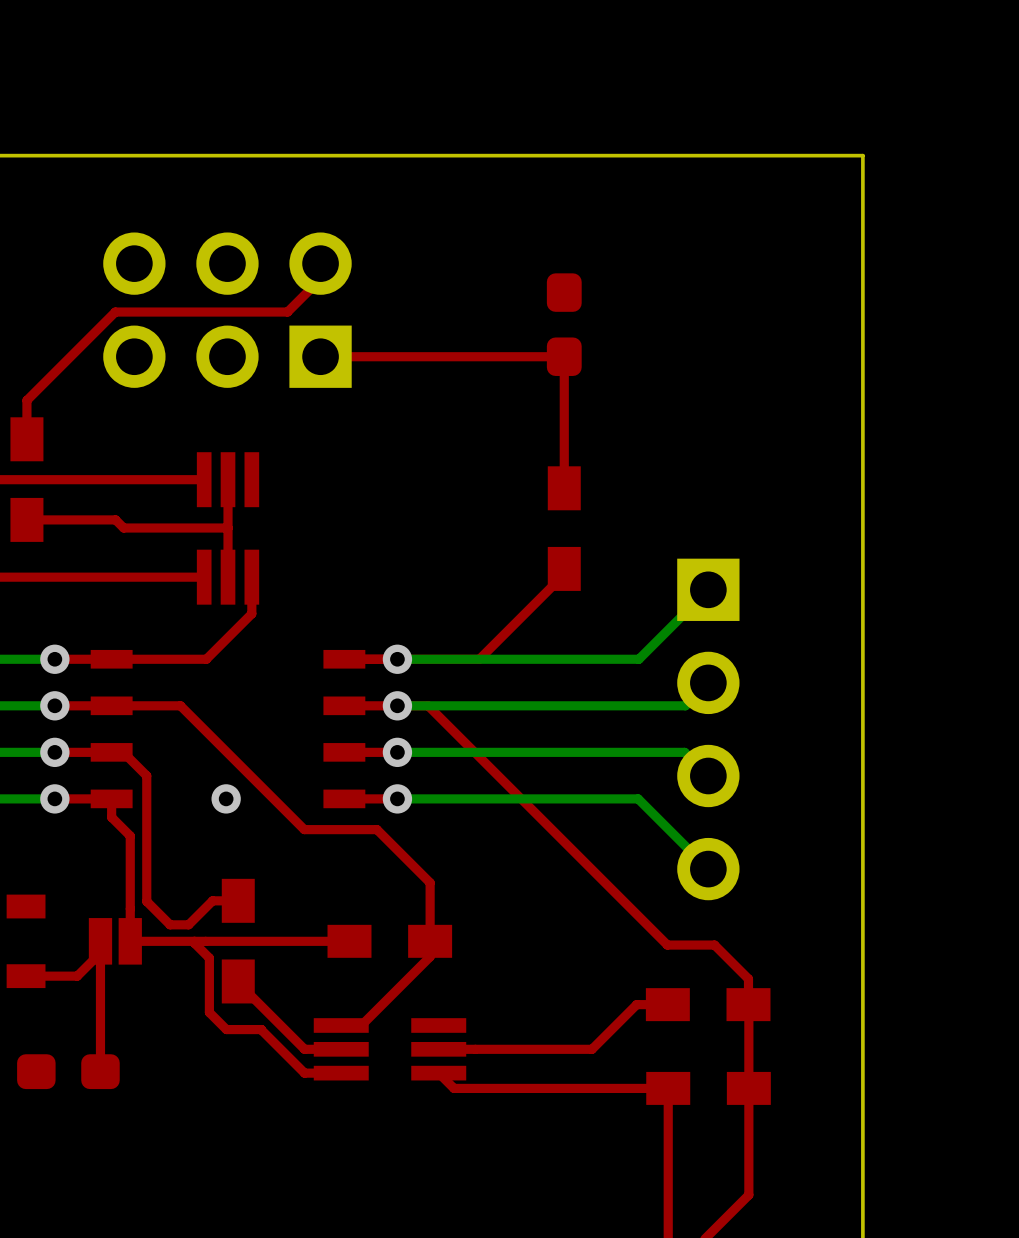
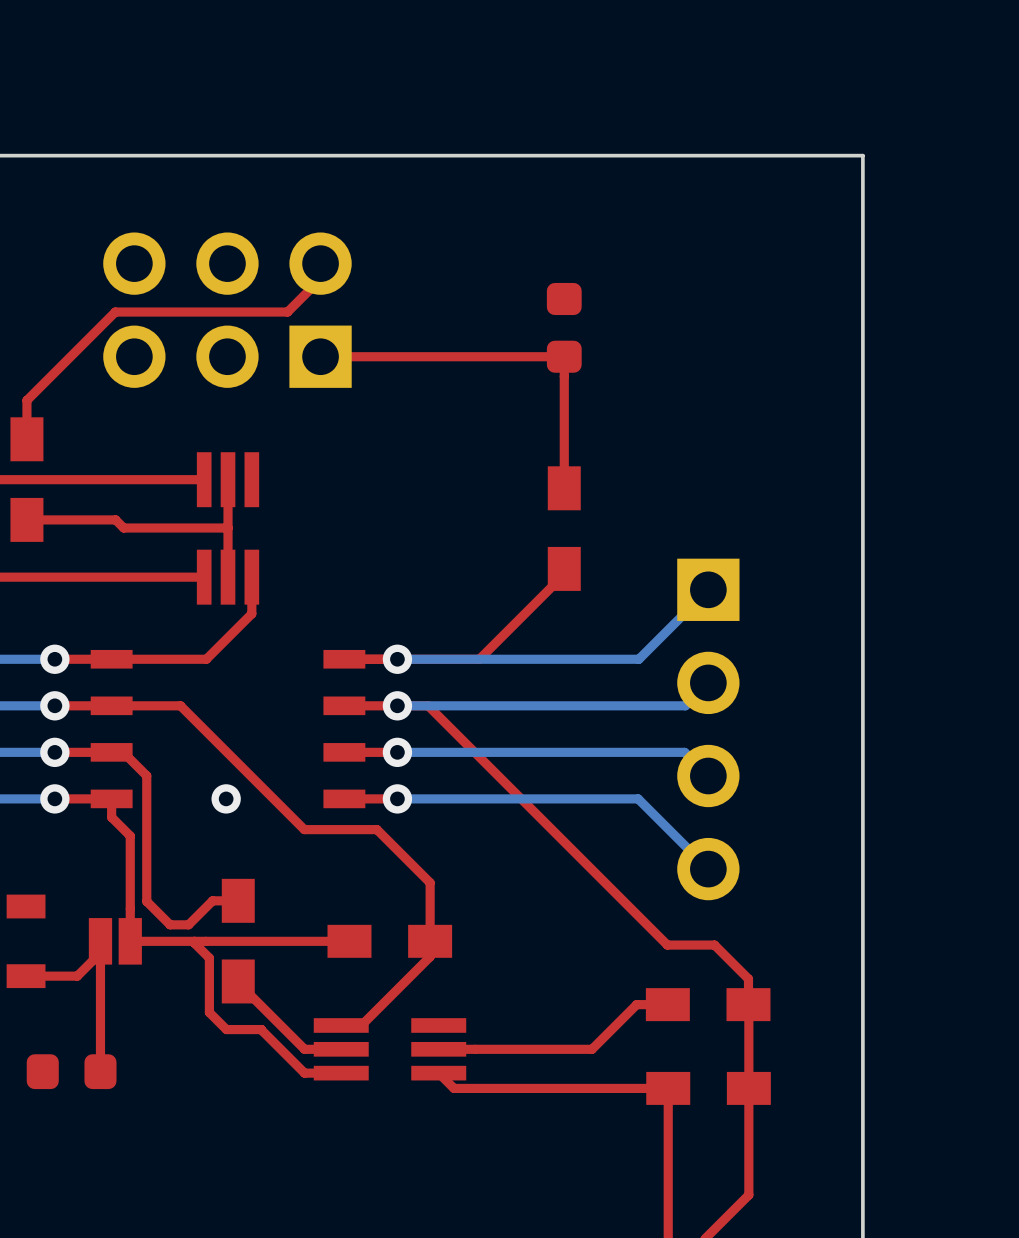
part footprint: [546, 273, 582, 376] -> [546, 282, 582, 373]
part footprint: [17, 1054, 120, 1090] -> [26, 1054, 117, 1090]

